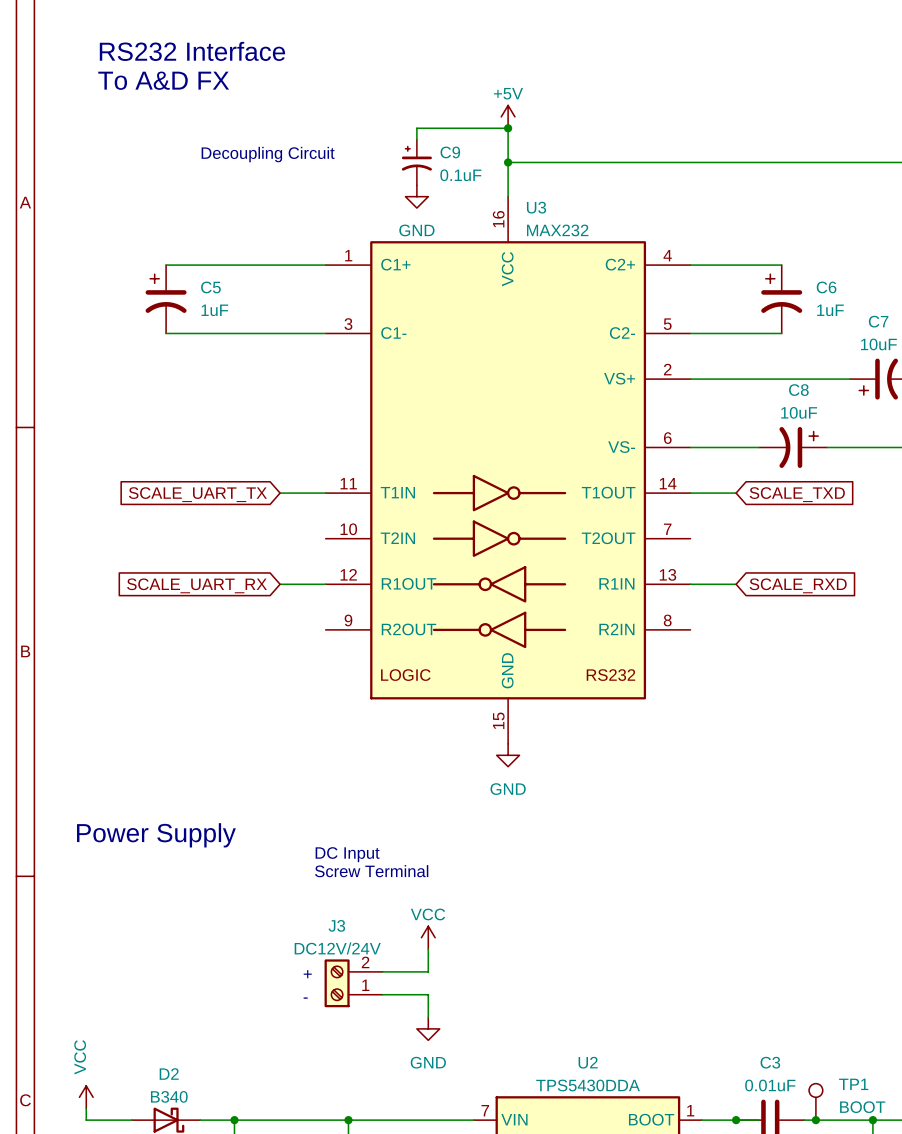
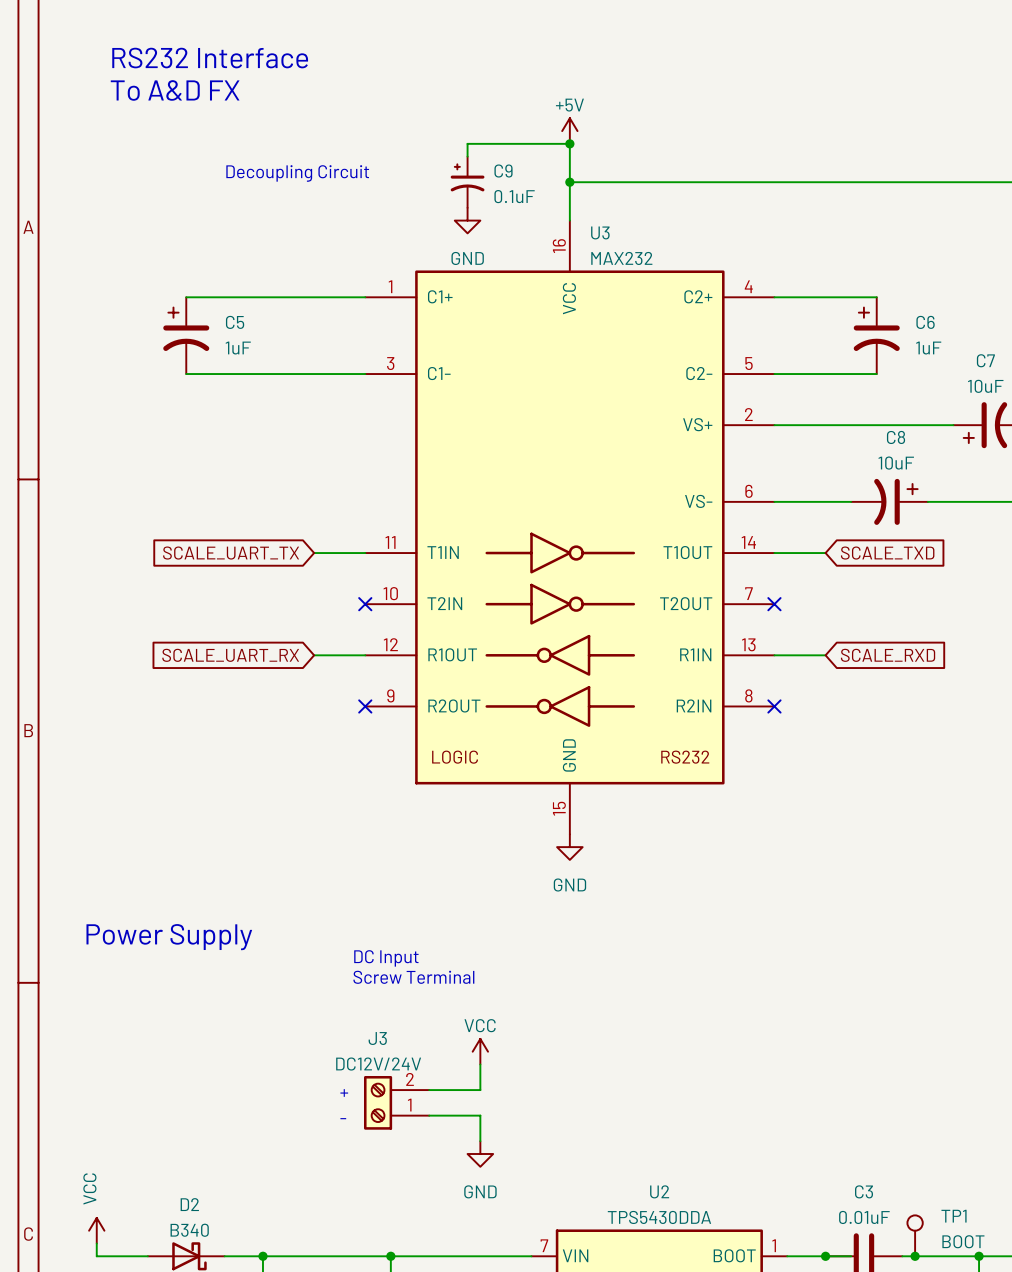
no-connect mark: none -> (365, 604)
no-connect mark: none -> (774, 604)
no-connect mark: none -> (365, 706)
no-connect mark: none -> (774, 706)

